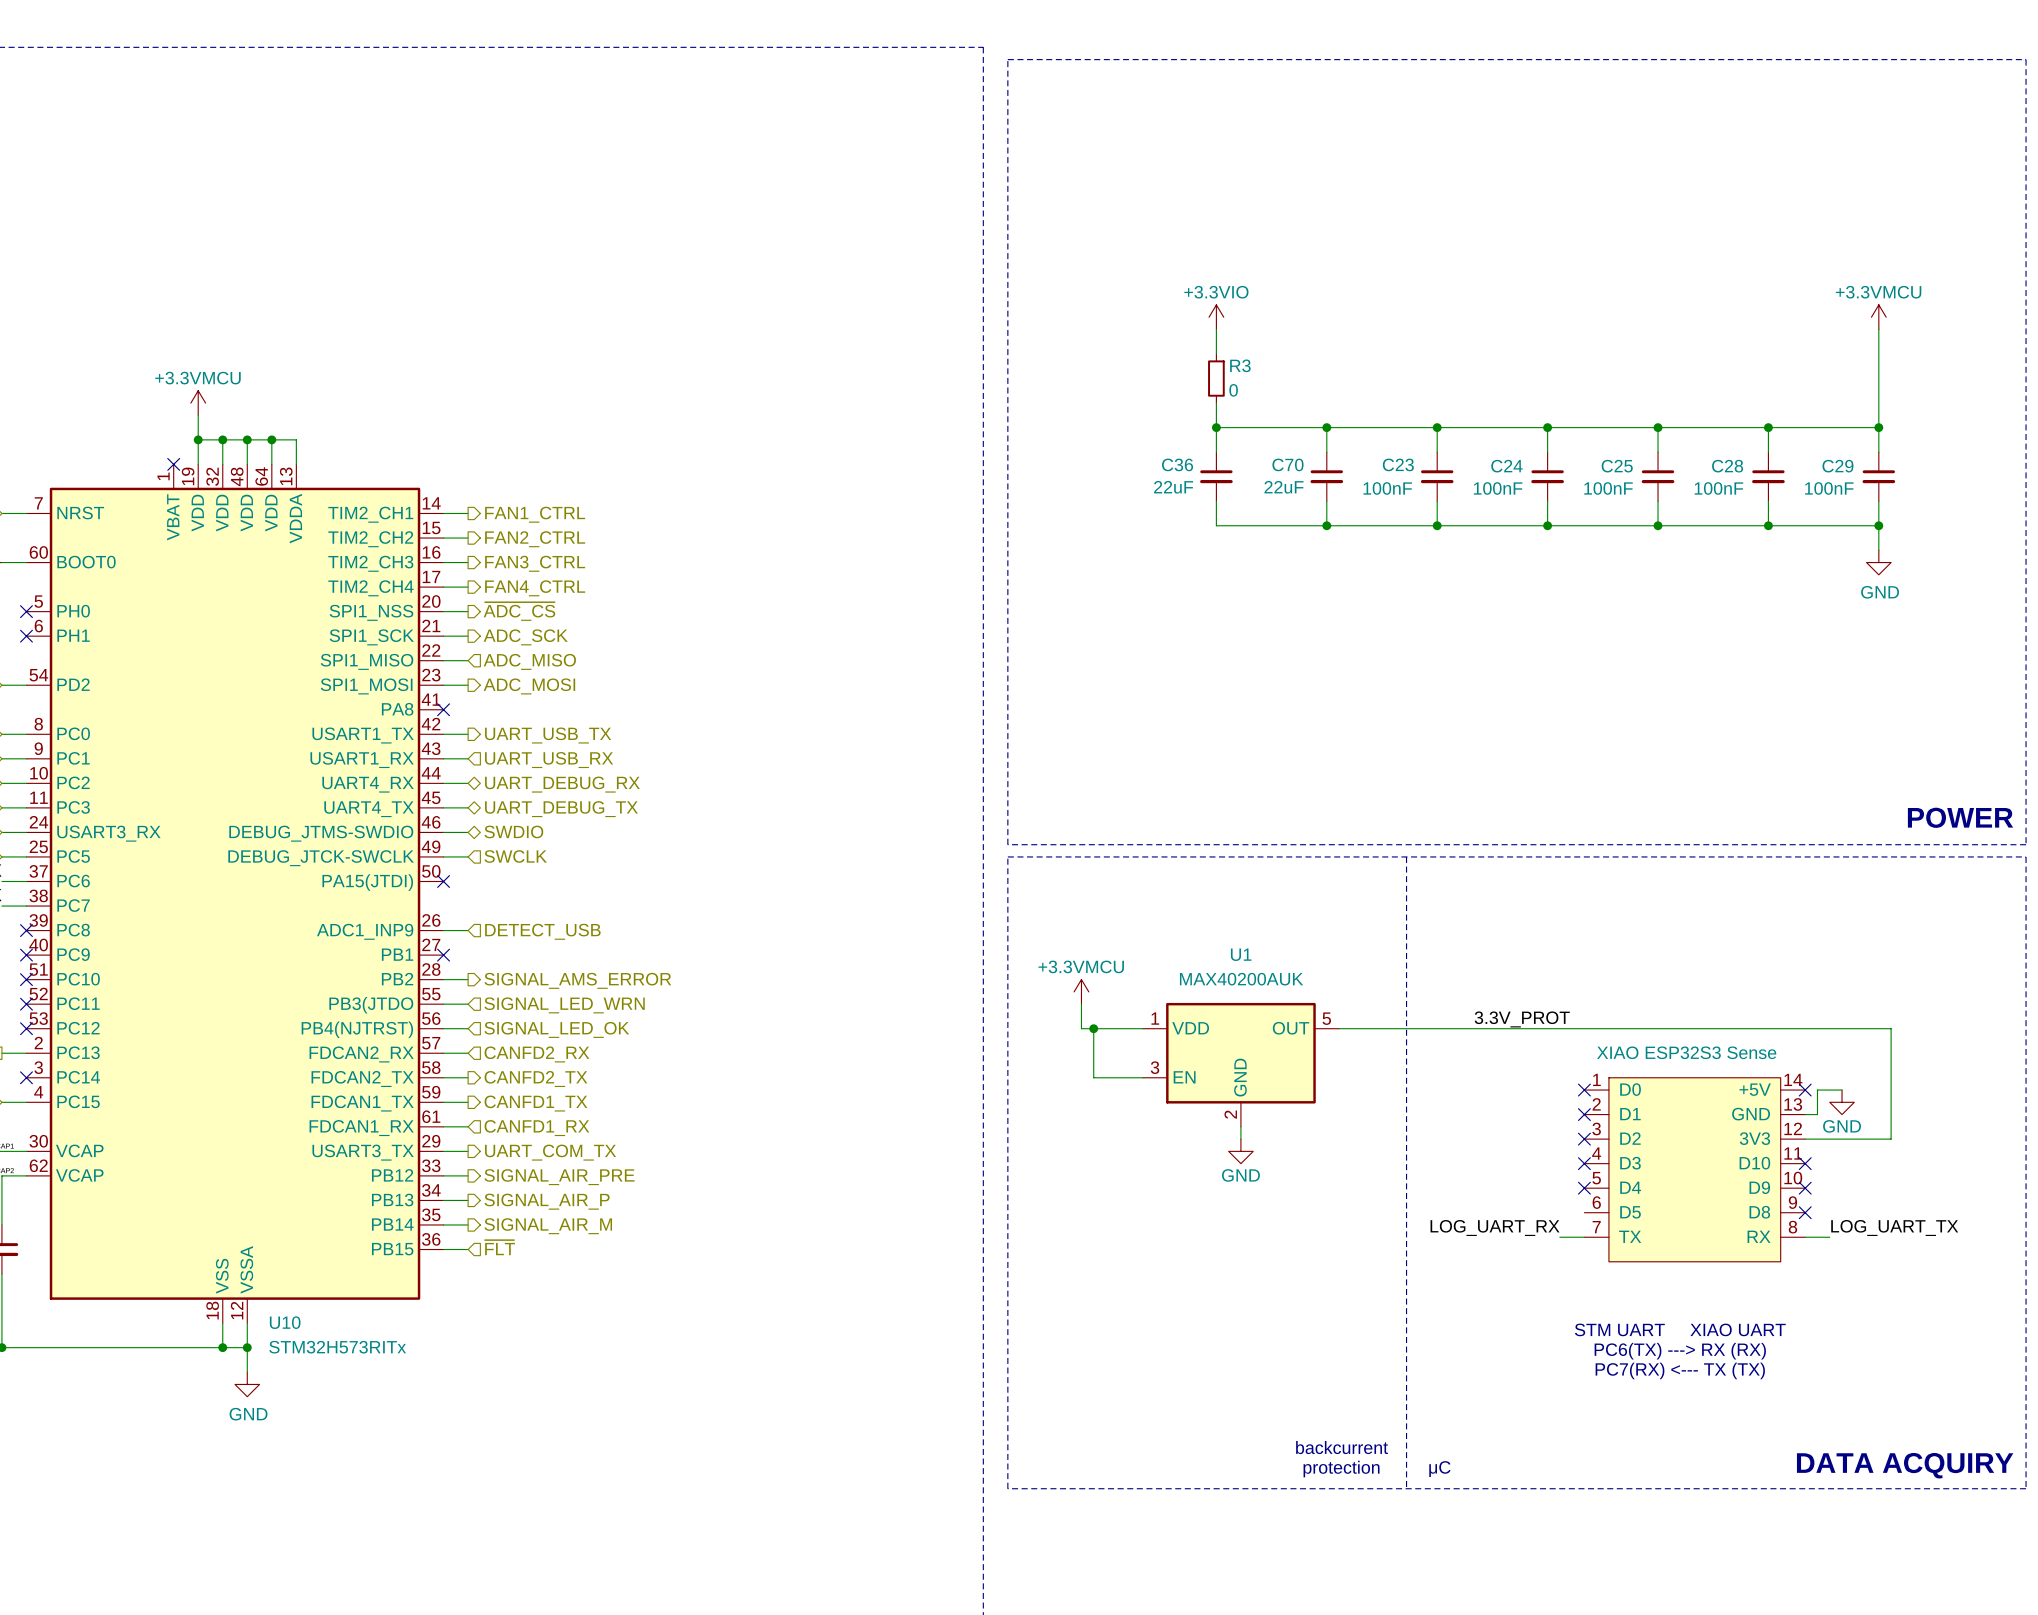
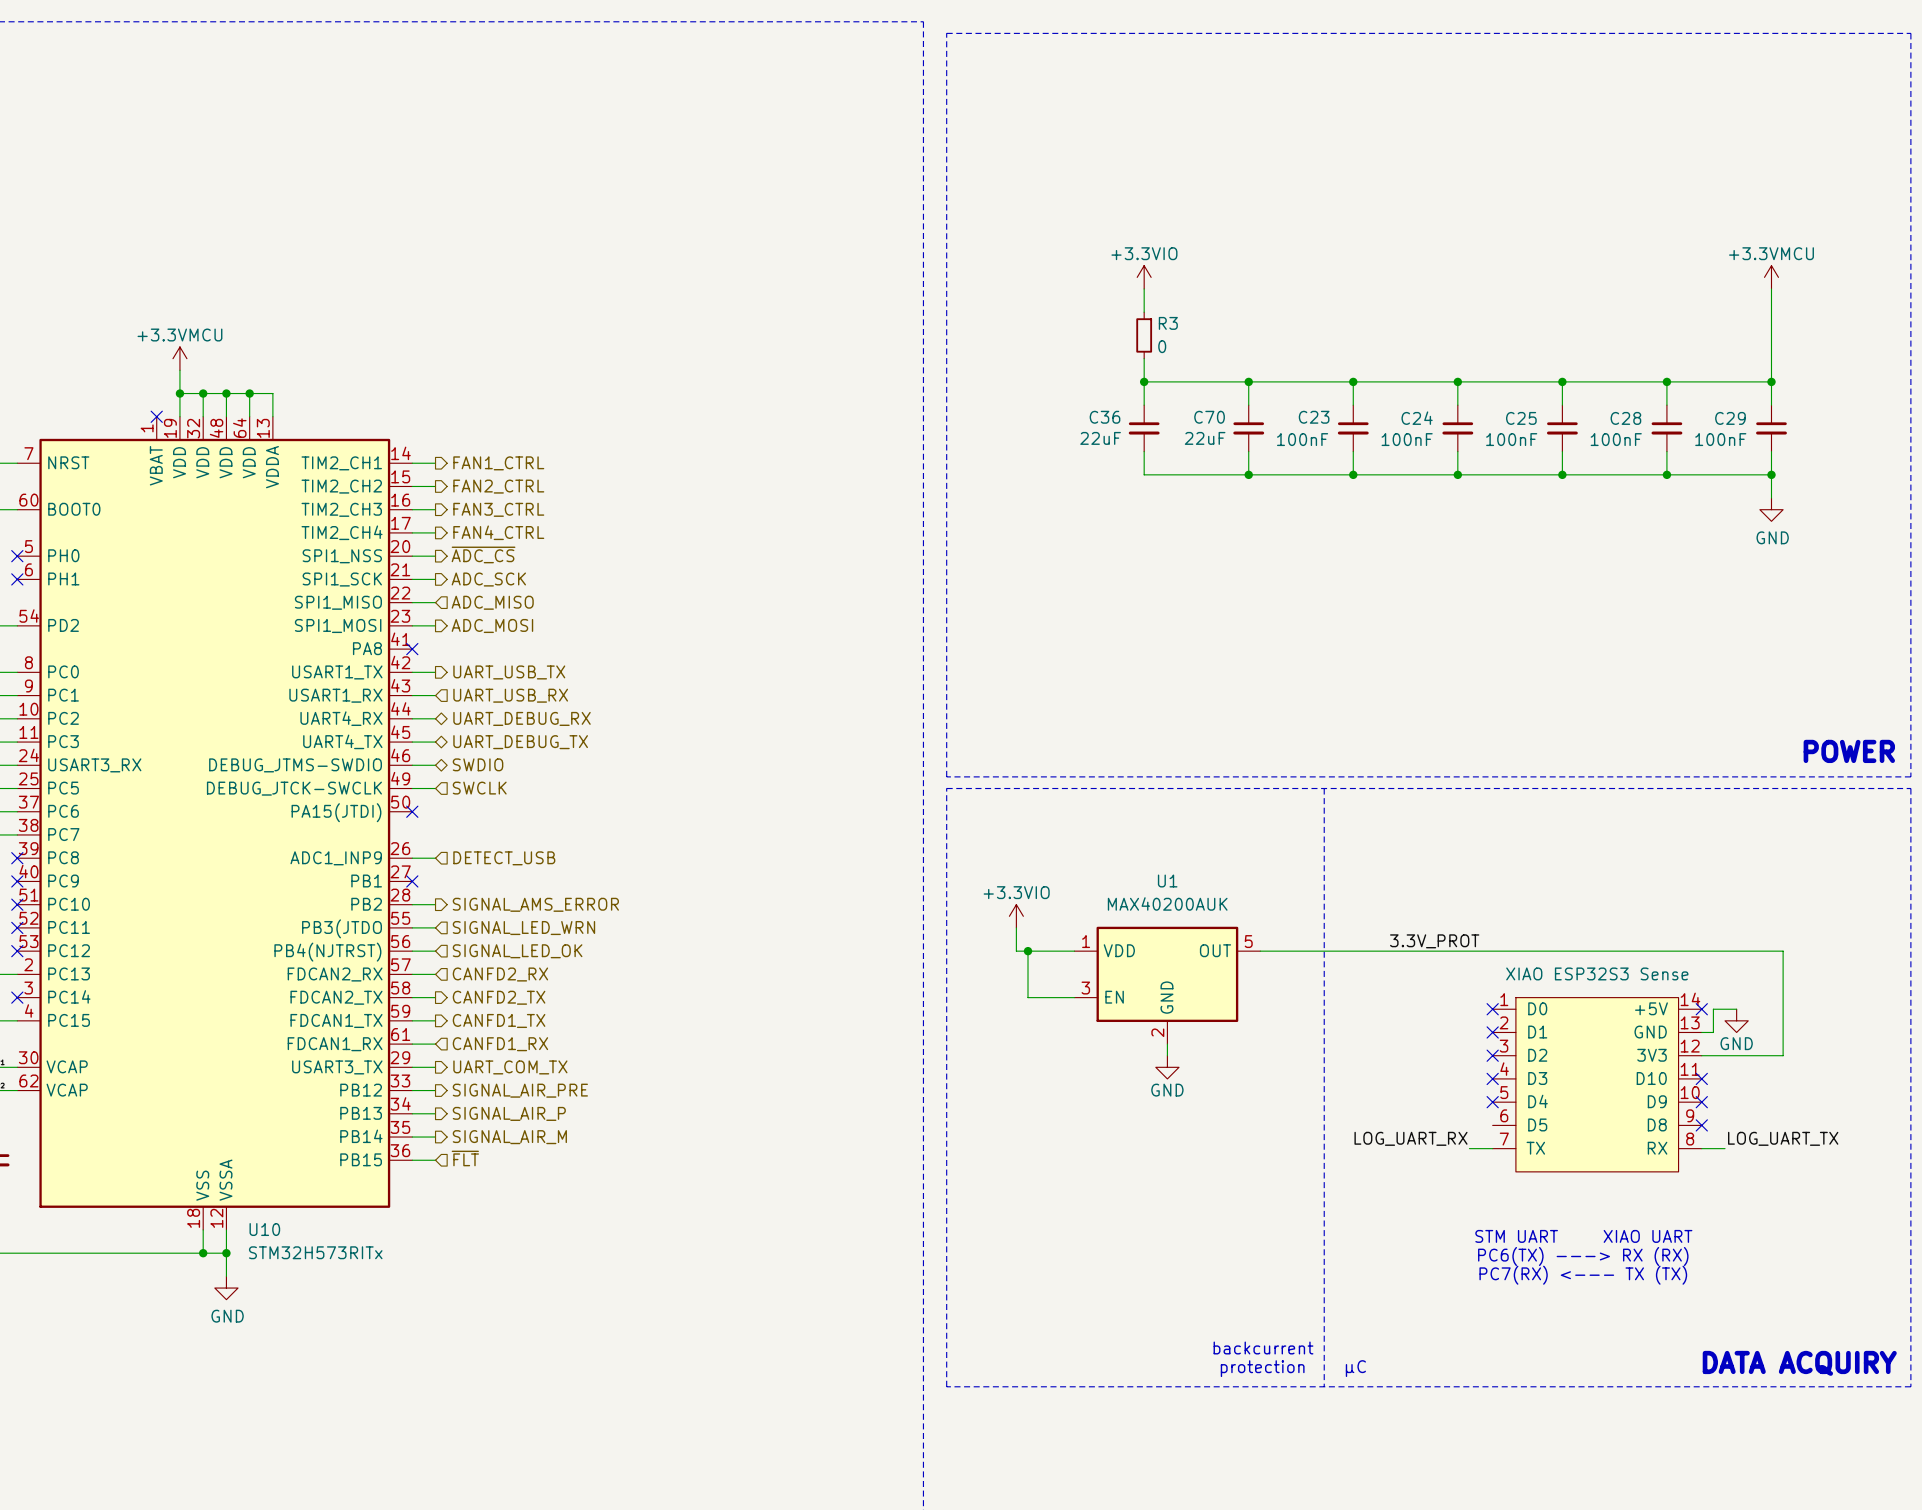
power symbol: +3.3VMCU (1081, 991) -> +3.3VIO (1016, 916)

